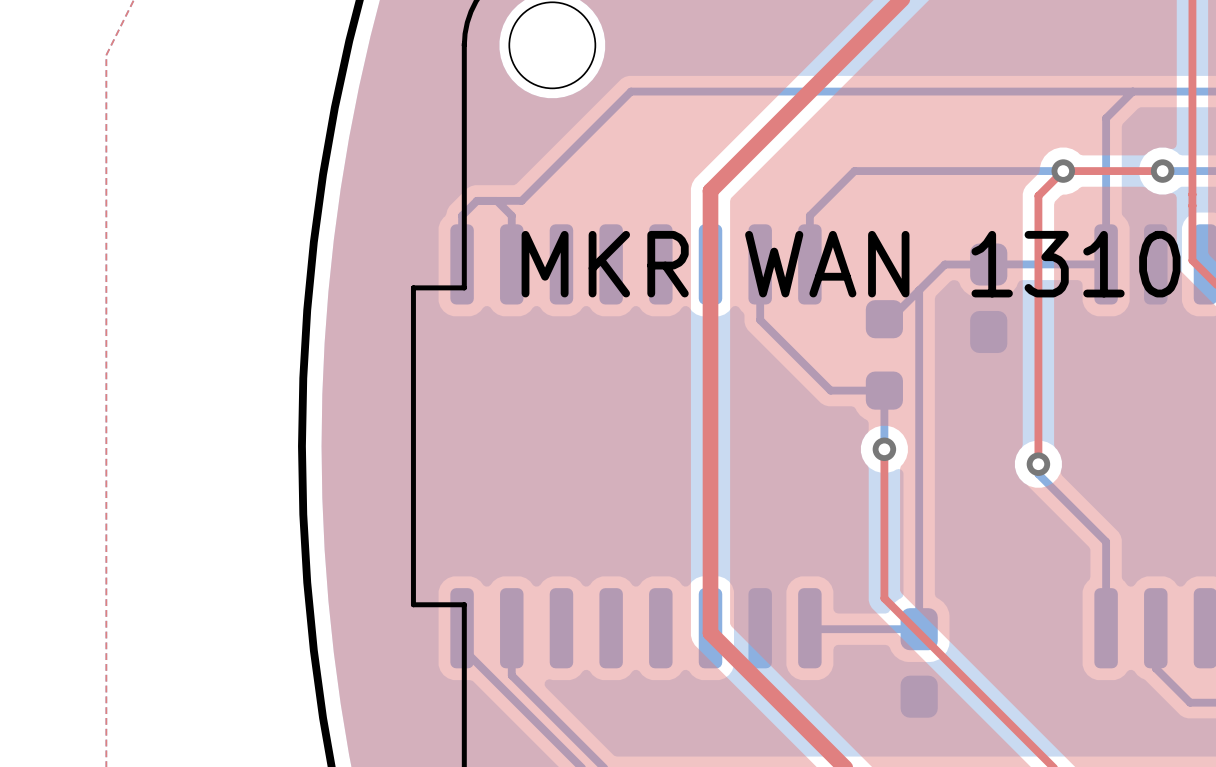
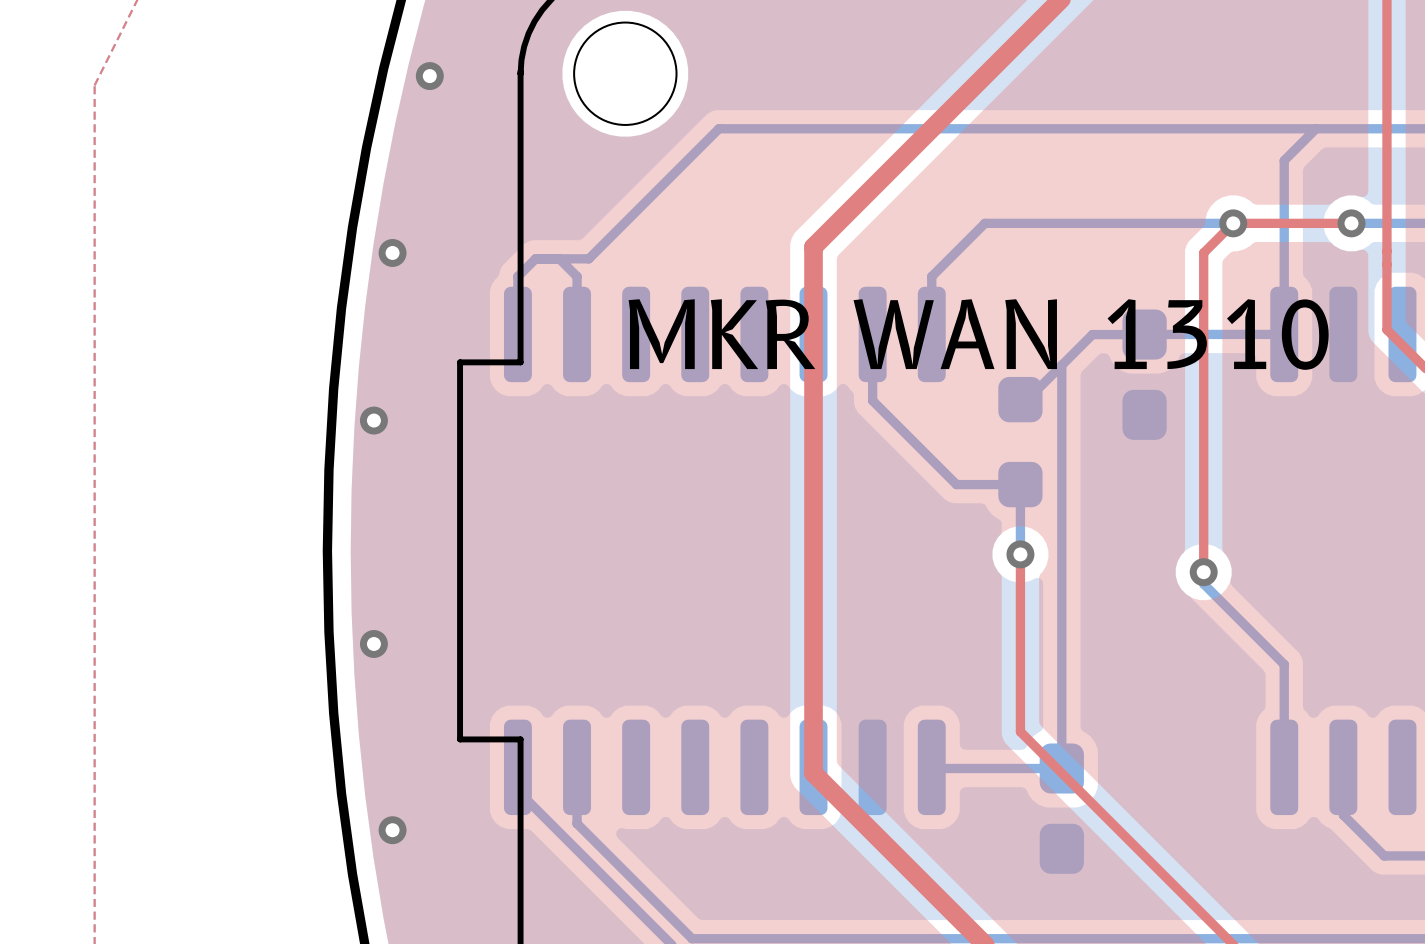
via: none -> (429, 76)
via: none -> (392, 252)
via: none -> (373, 420)
via: none -> (373, 643)
via: none -> (392, 830)

